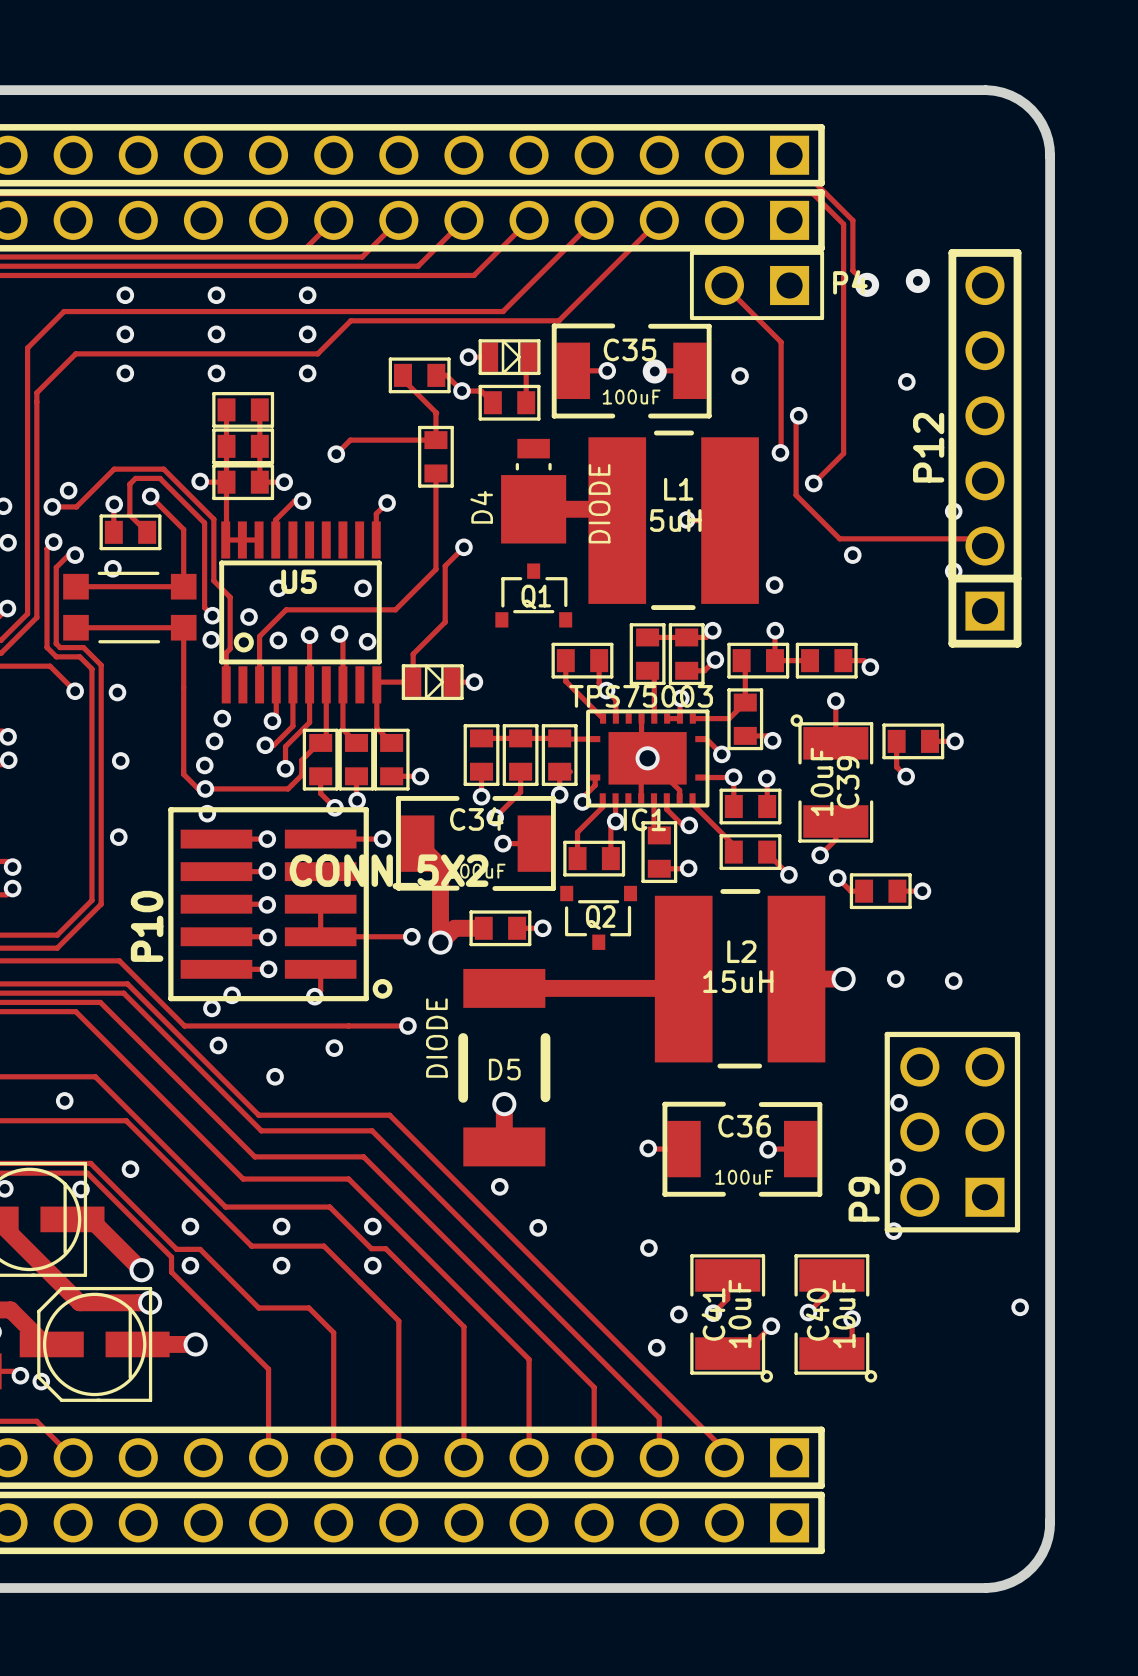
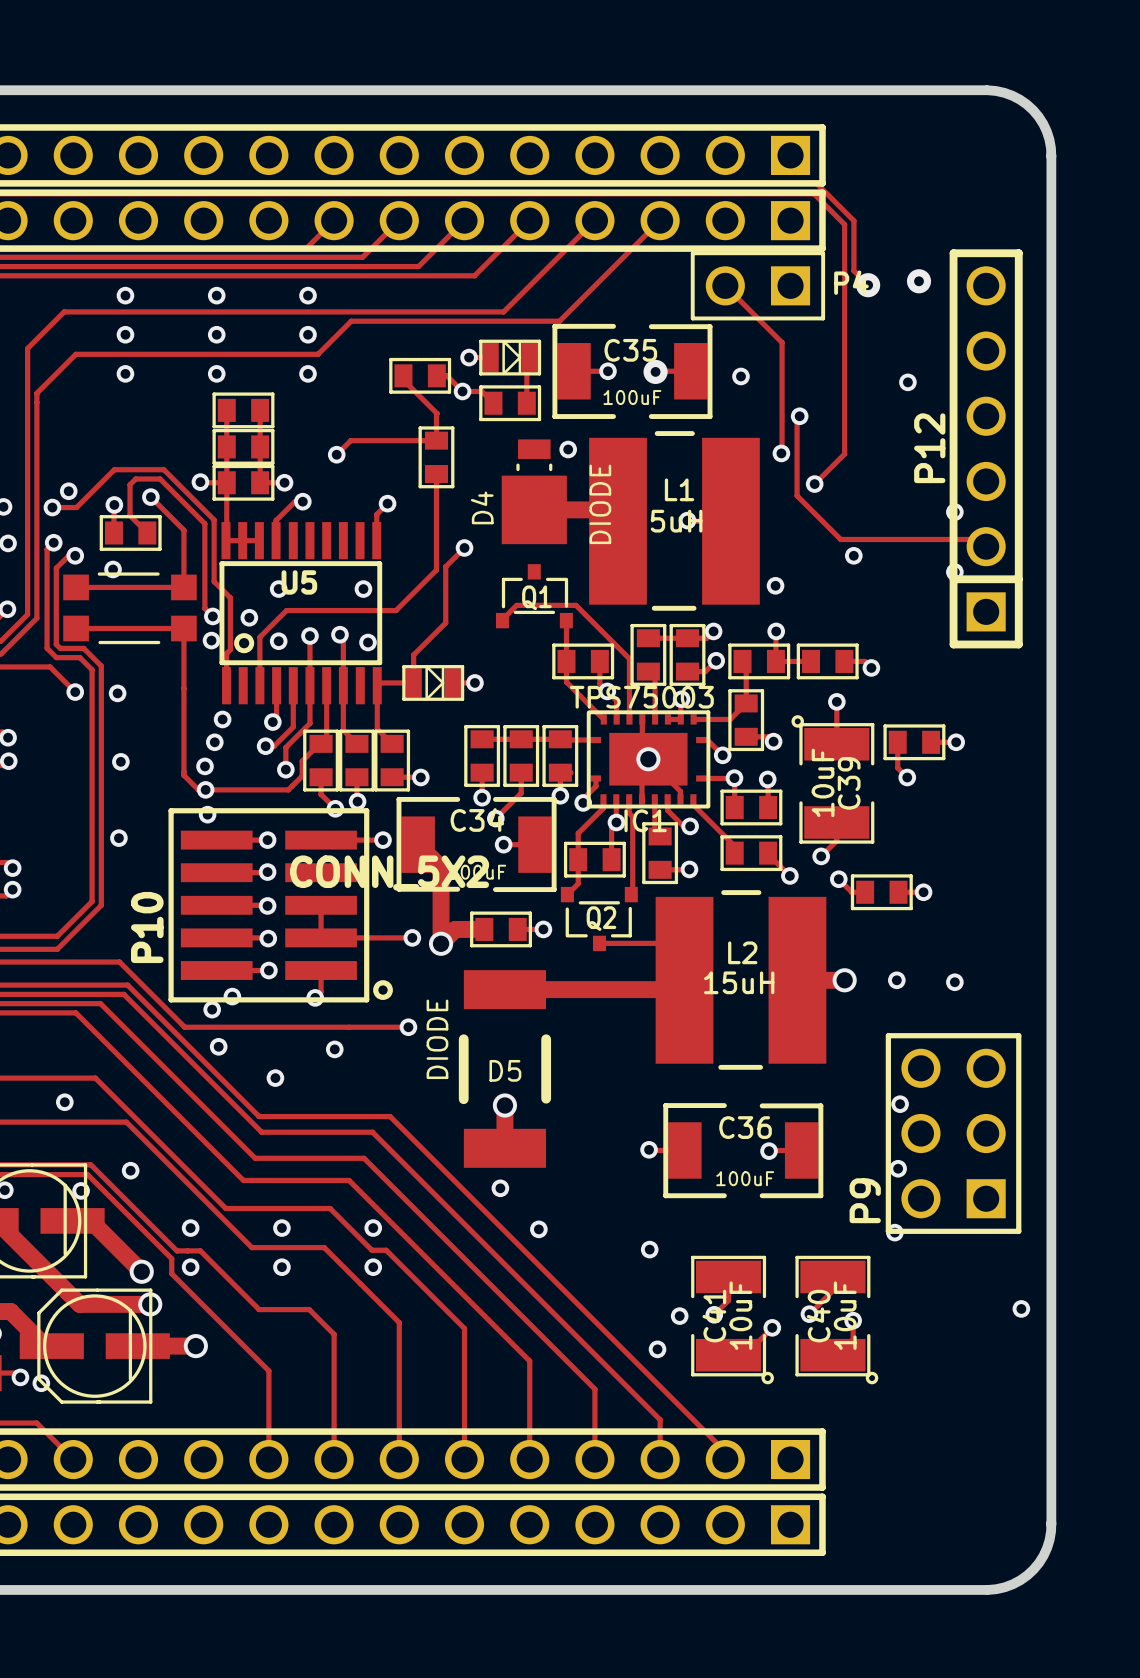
via: none -> (568, 449)
track: none -> (502, 620) (516, 605) (576, 605) (629, 658) (629, 719)
track: none -> (566, 620) (566, 661)
track: none -> (629, 799) (629, 813) (632, 816) (631, 894)
track: none -> (578, 859) (578, 883) (567, 894)
track: none -> (599, 943) (656, 943) (684, 971) (684, 980)

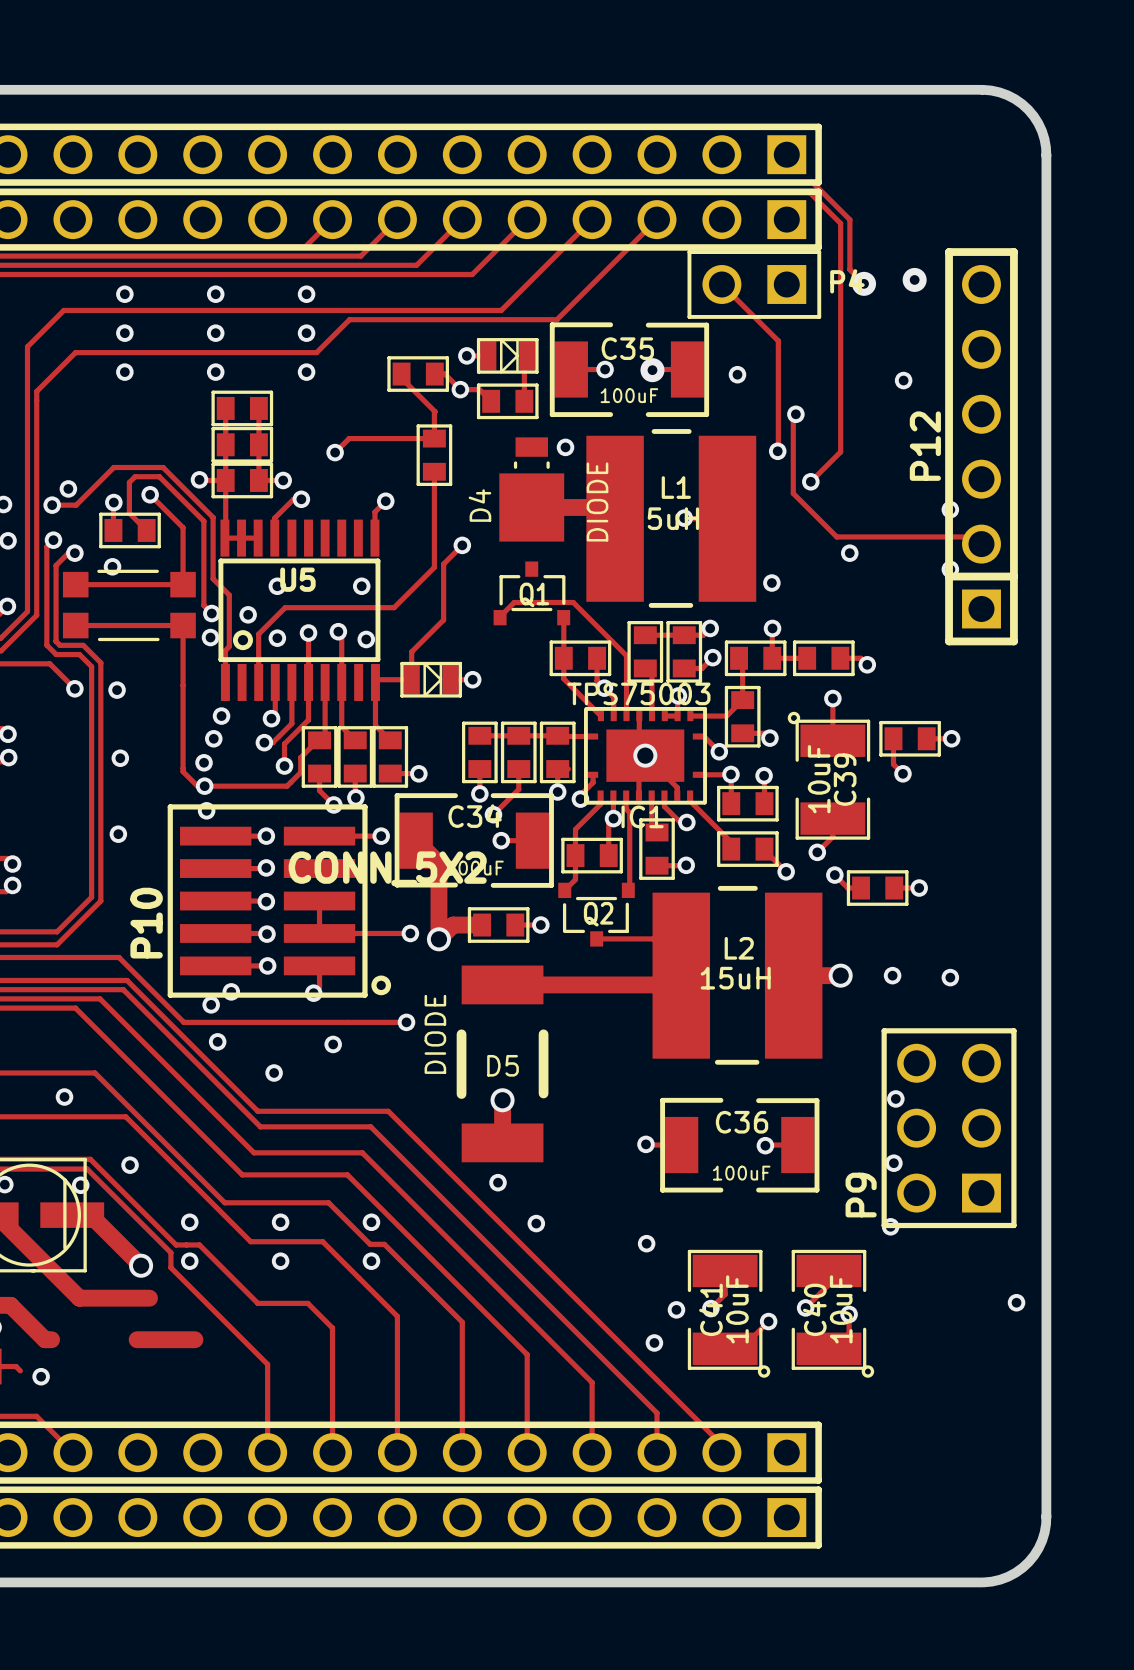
via: (150, 1304) -> none
part: (94, 1346) -> none
via: (195, 1346) -> none
via: (20, 1377) -> none

